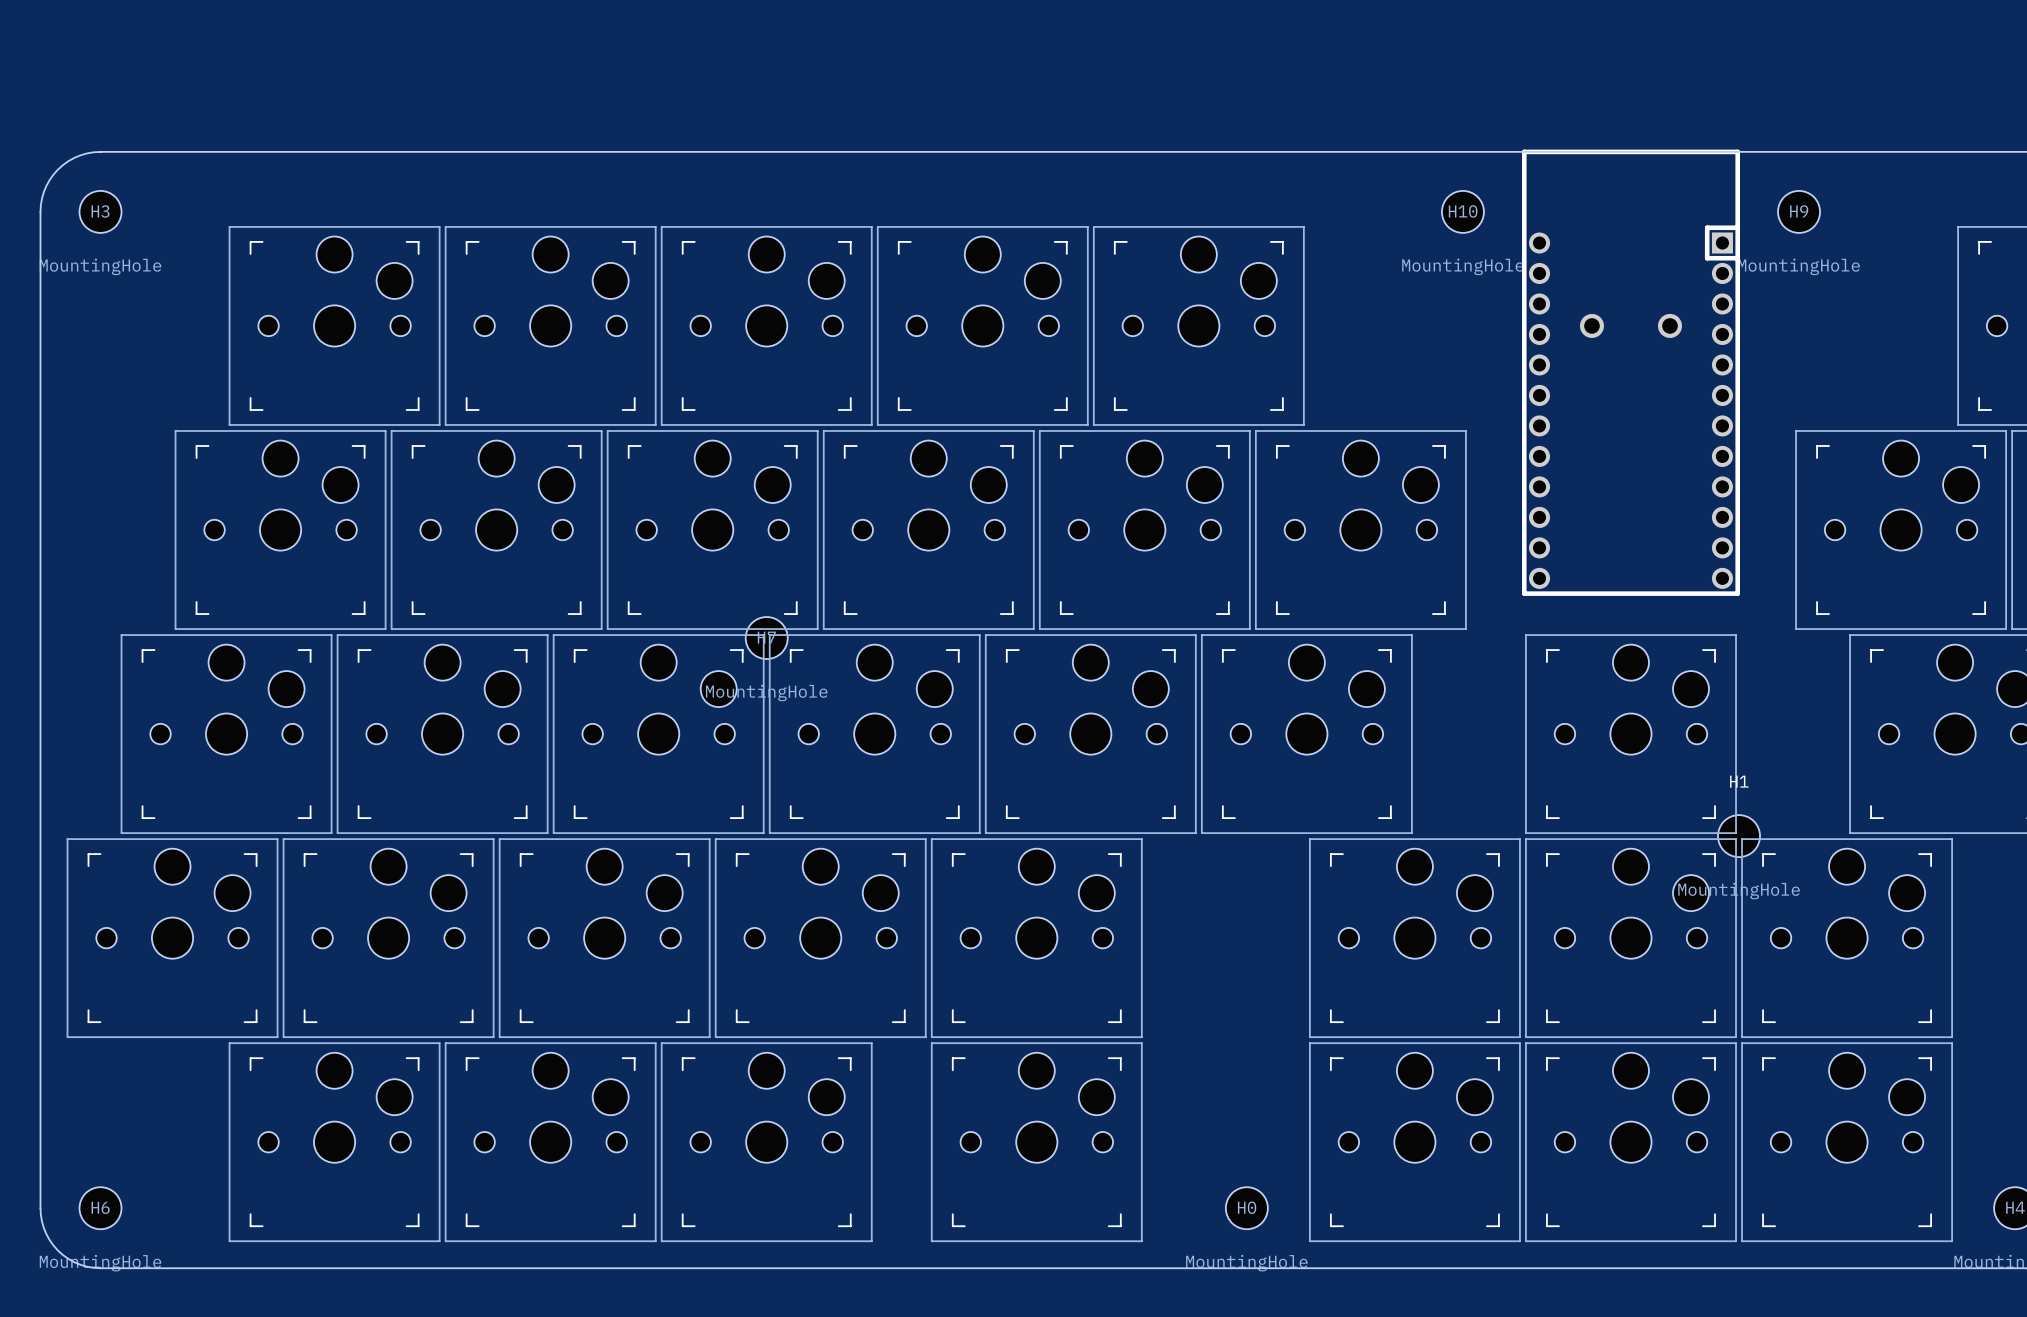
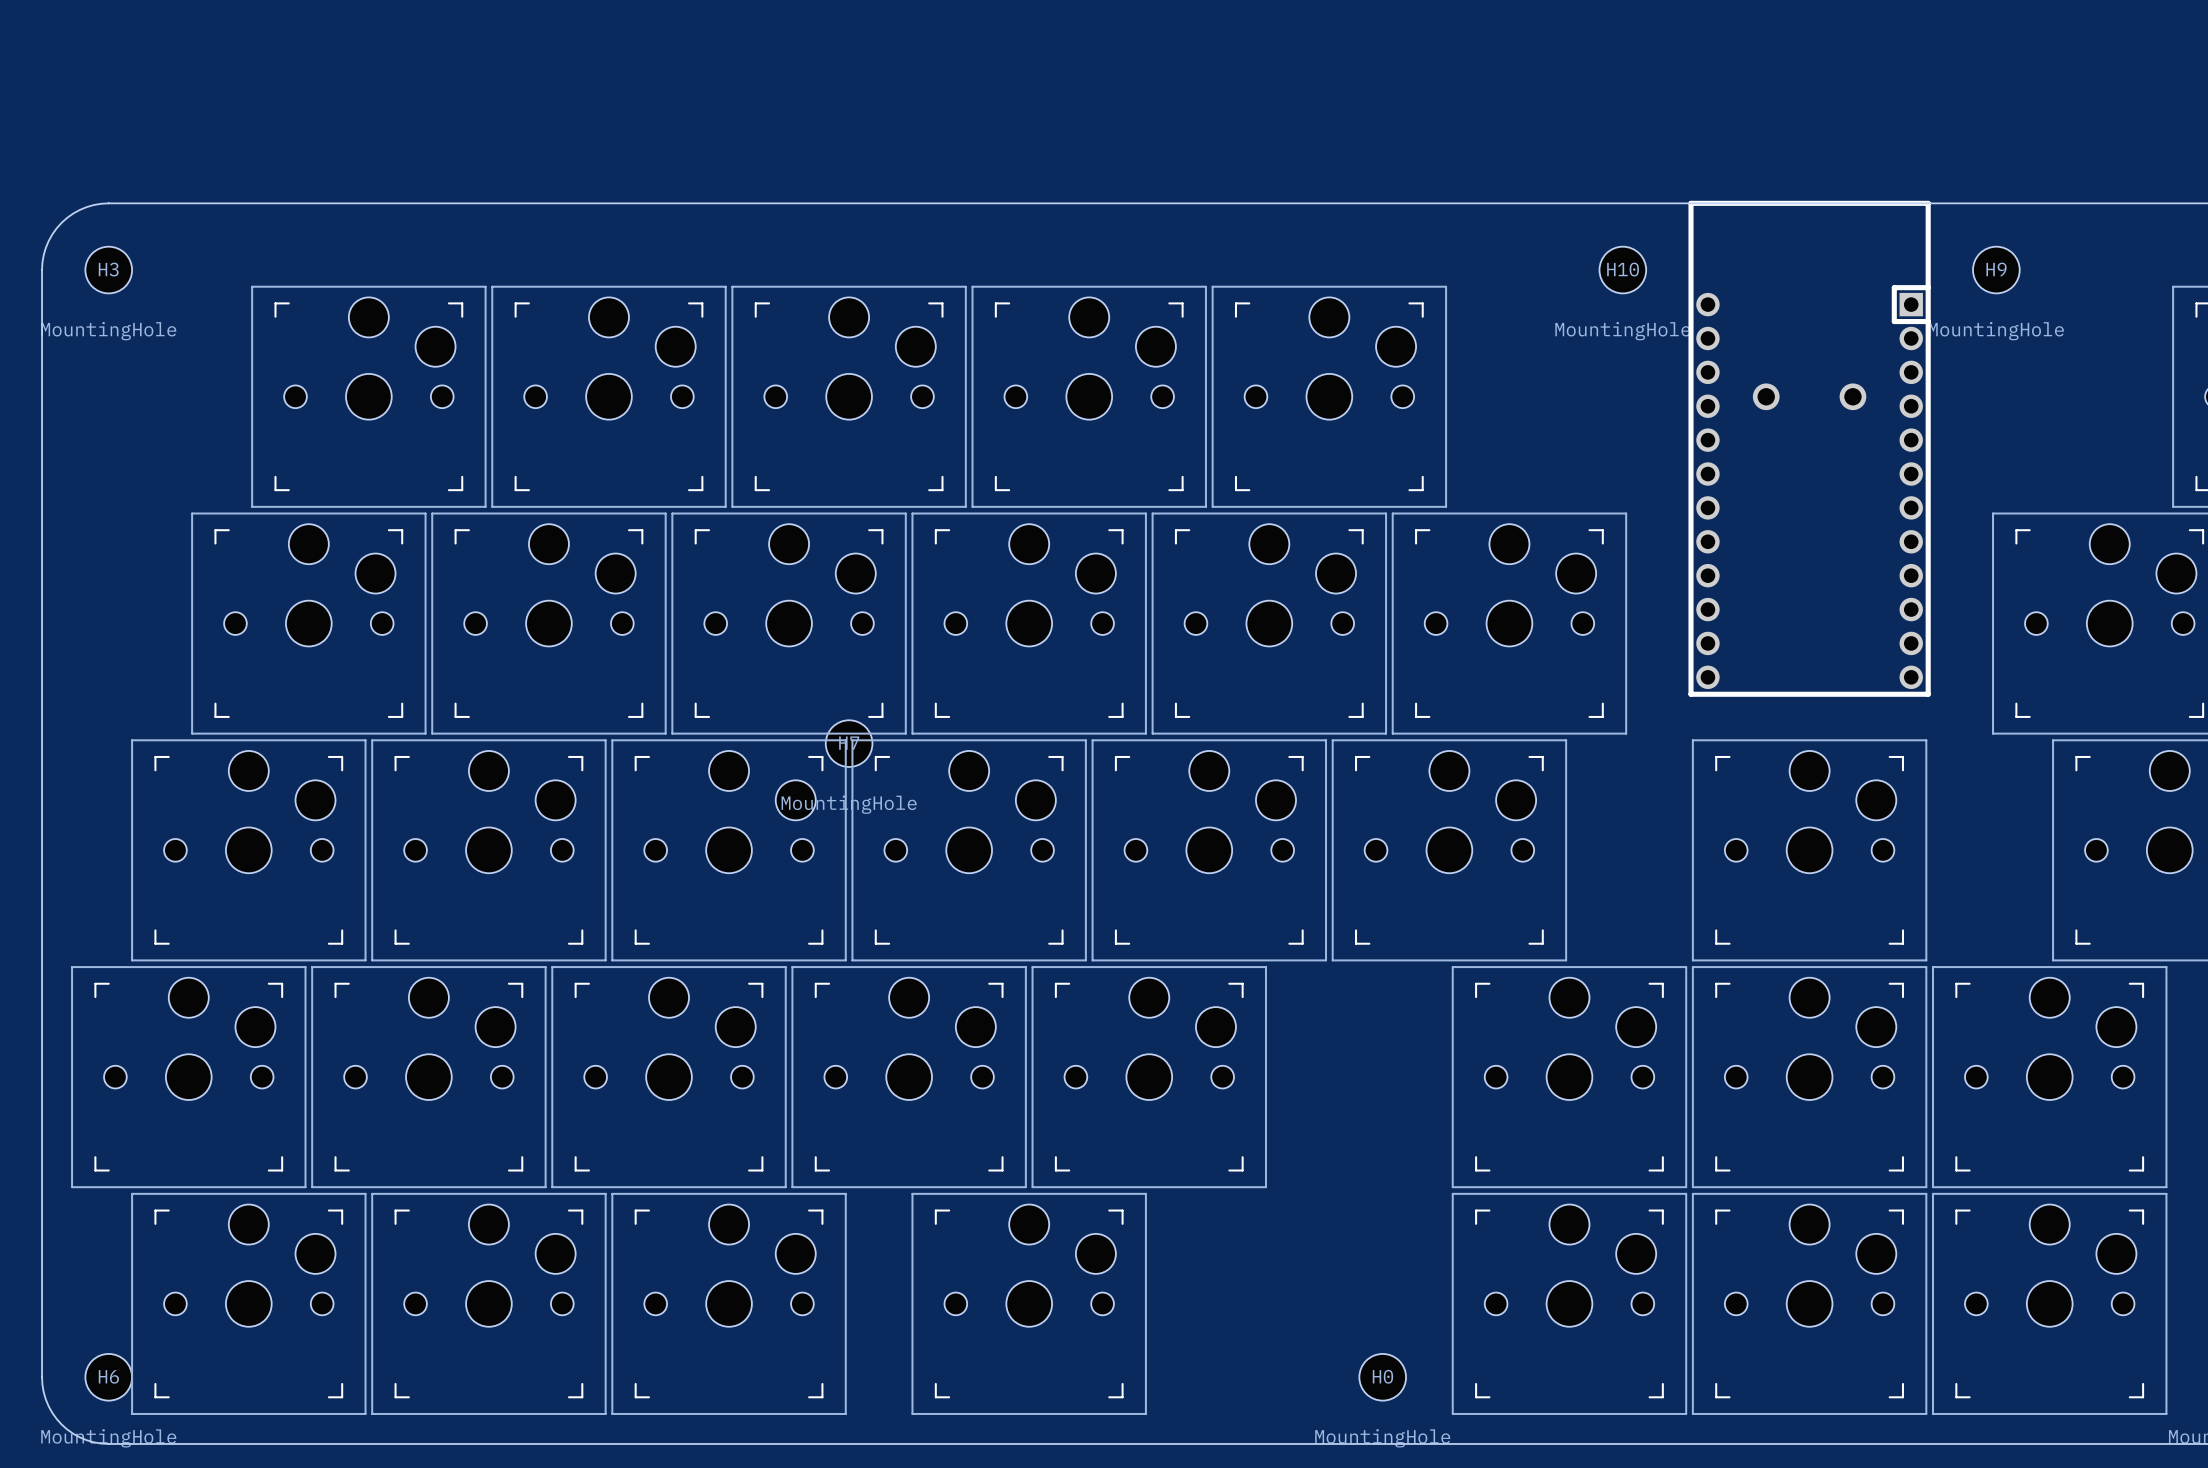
H1: MountingHole (1739, 836) -> none
part: none -> (248, 1303)
part: (334, 1142) -> none
part: none -> (488, 1303)
part: (550, 1142) -> none
part: none -> (729, 1303)
part: (766, 1142) -> none
part: none -> (1029, 1303)
part: (1036, 1142) -> none

